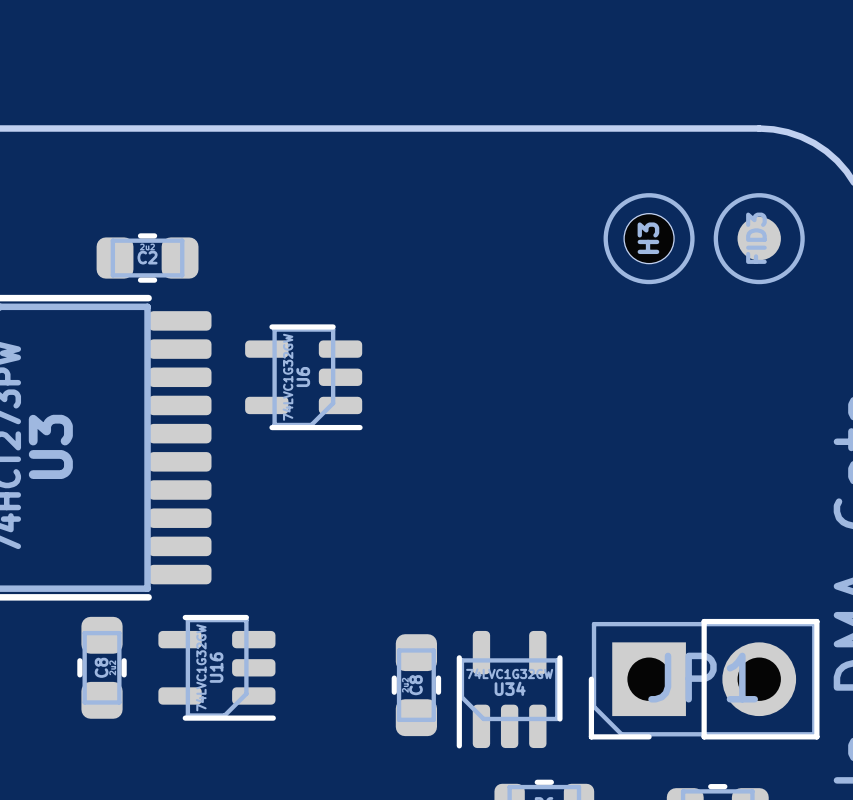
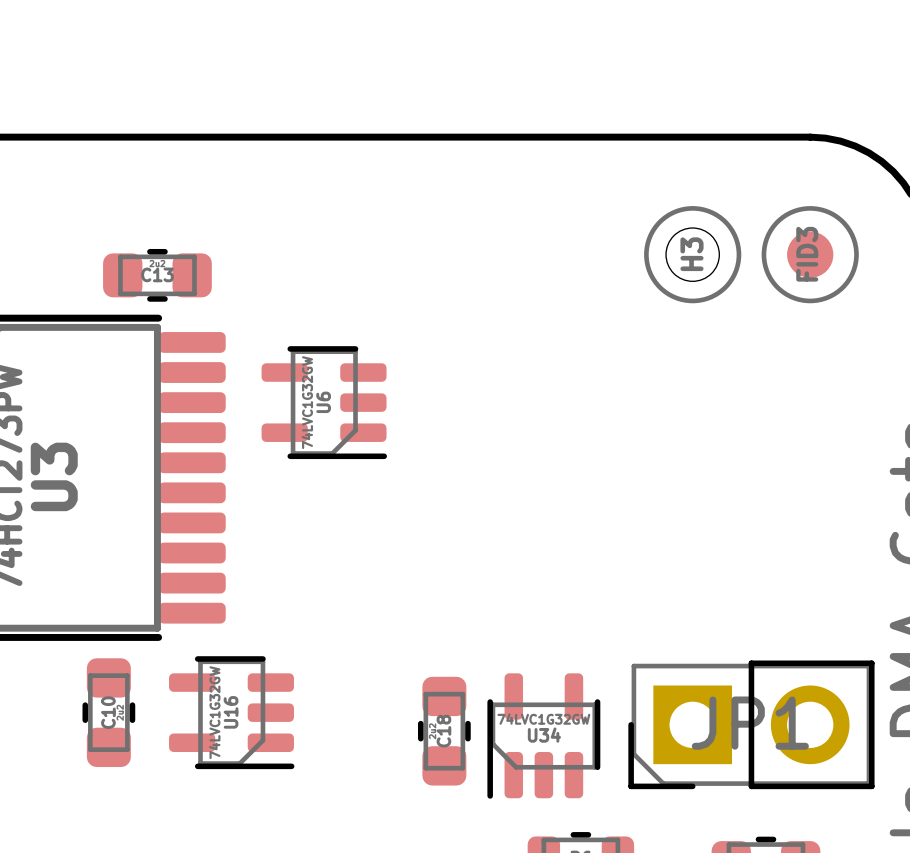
C2 name: C2 (147, 257) -> C13 (157, 274)
C8 name: C8 (101, 667) -> C10 (108, 712)
C8 name: C8 (415, 685) -> C18 (443, 731)

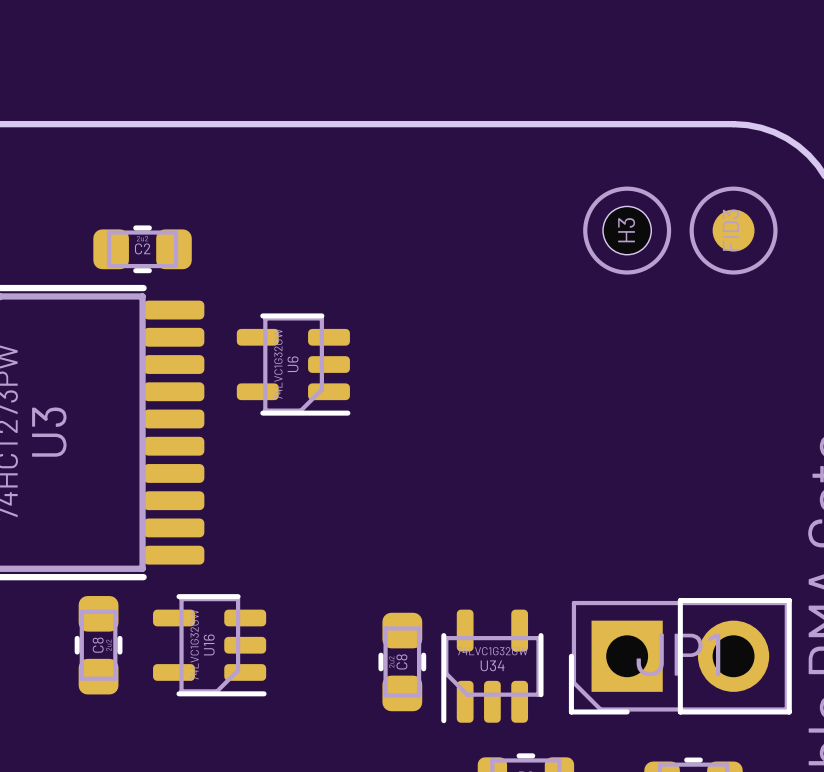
C13 name: C13 (157, 274) -> C2 (142, 248)
C10 name: C10 (108, 712) -> C8 (98, 645)
C18 name: C18 (443, 731) -> C8 (401, 661)

